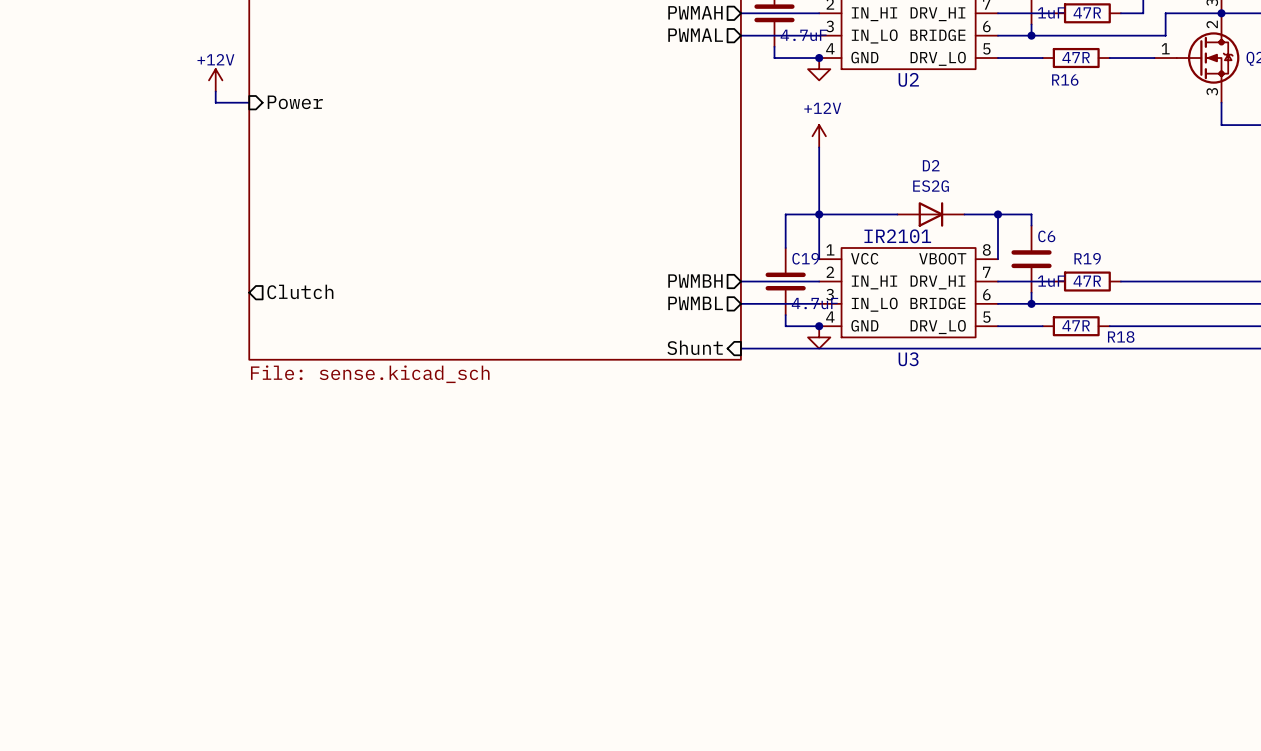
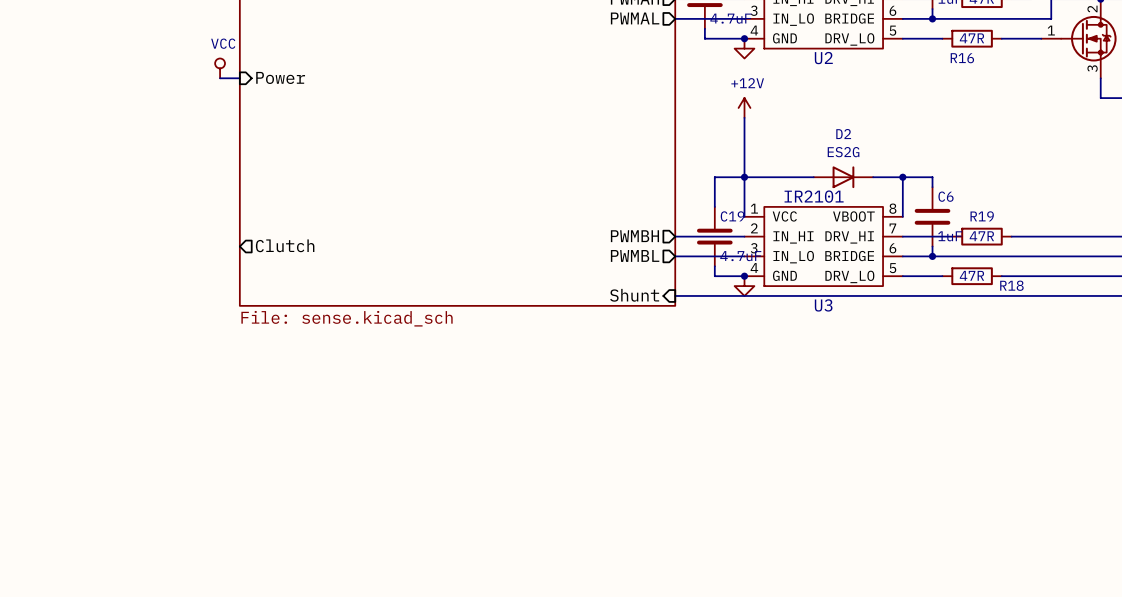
power symbol: +12V (215, 80) -> none
wire: (215, 91) (215, 102) (226, 102) -> none
power symbol: none -> VCC (220, 68)

